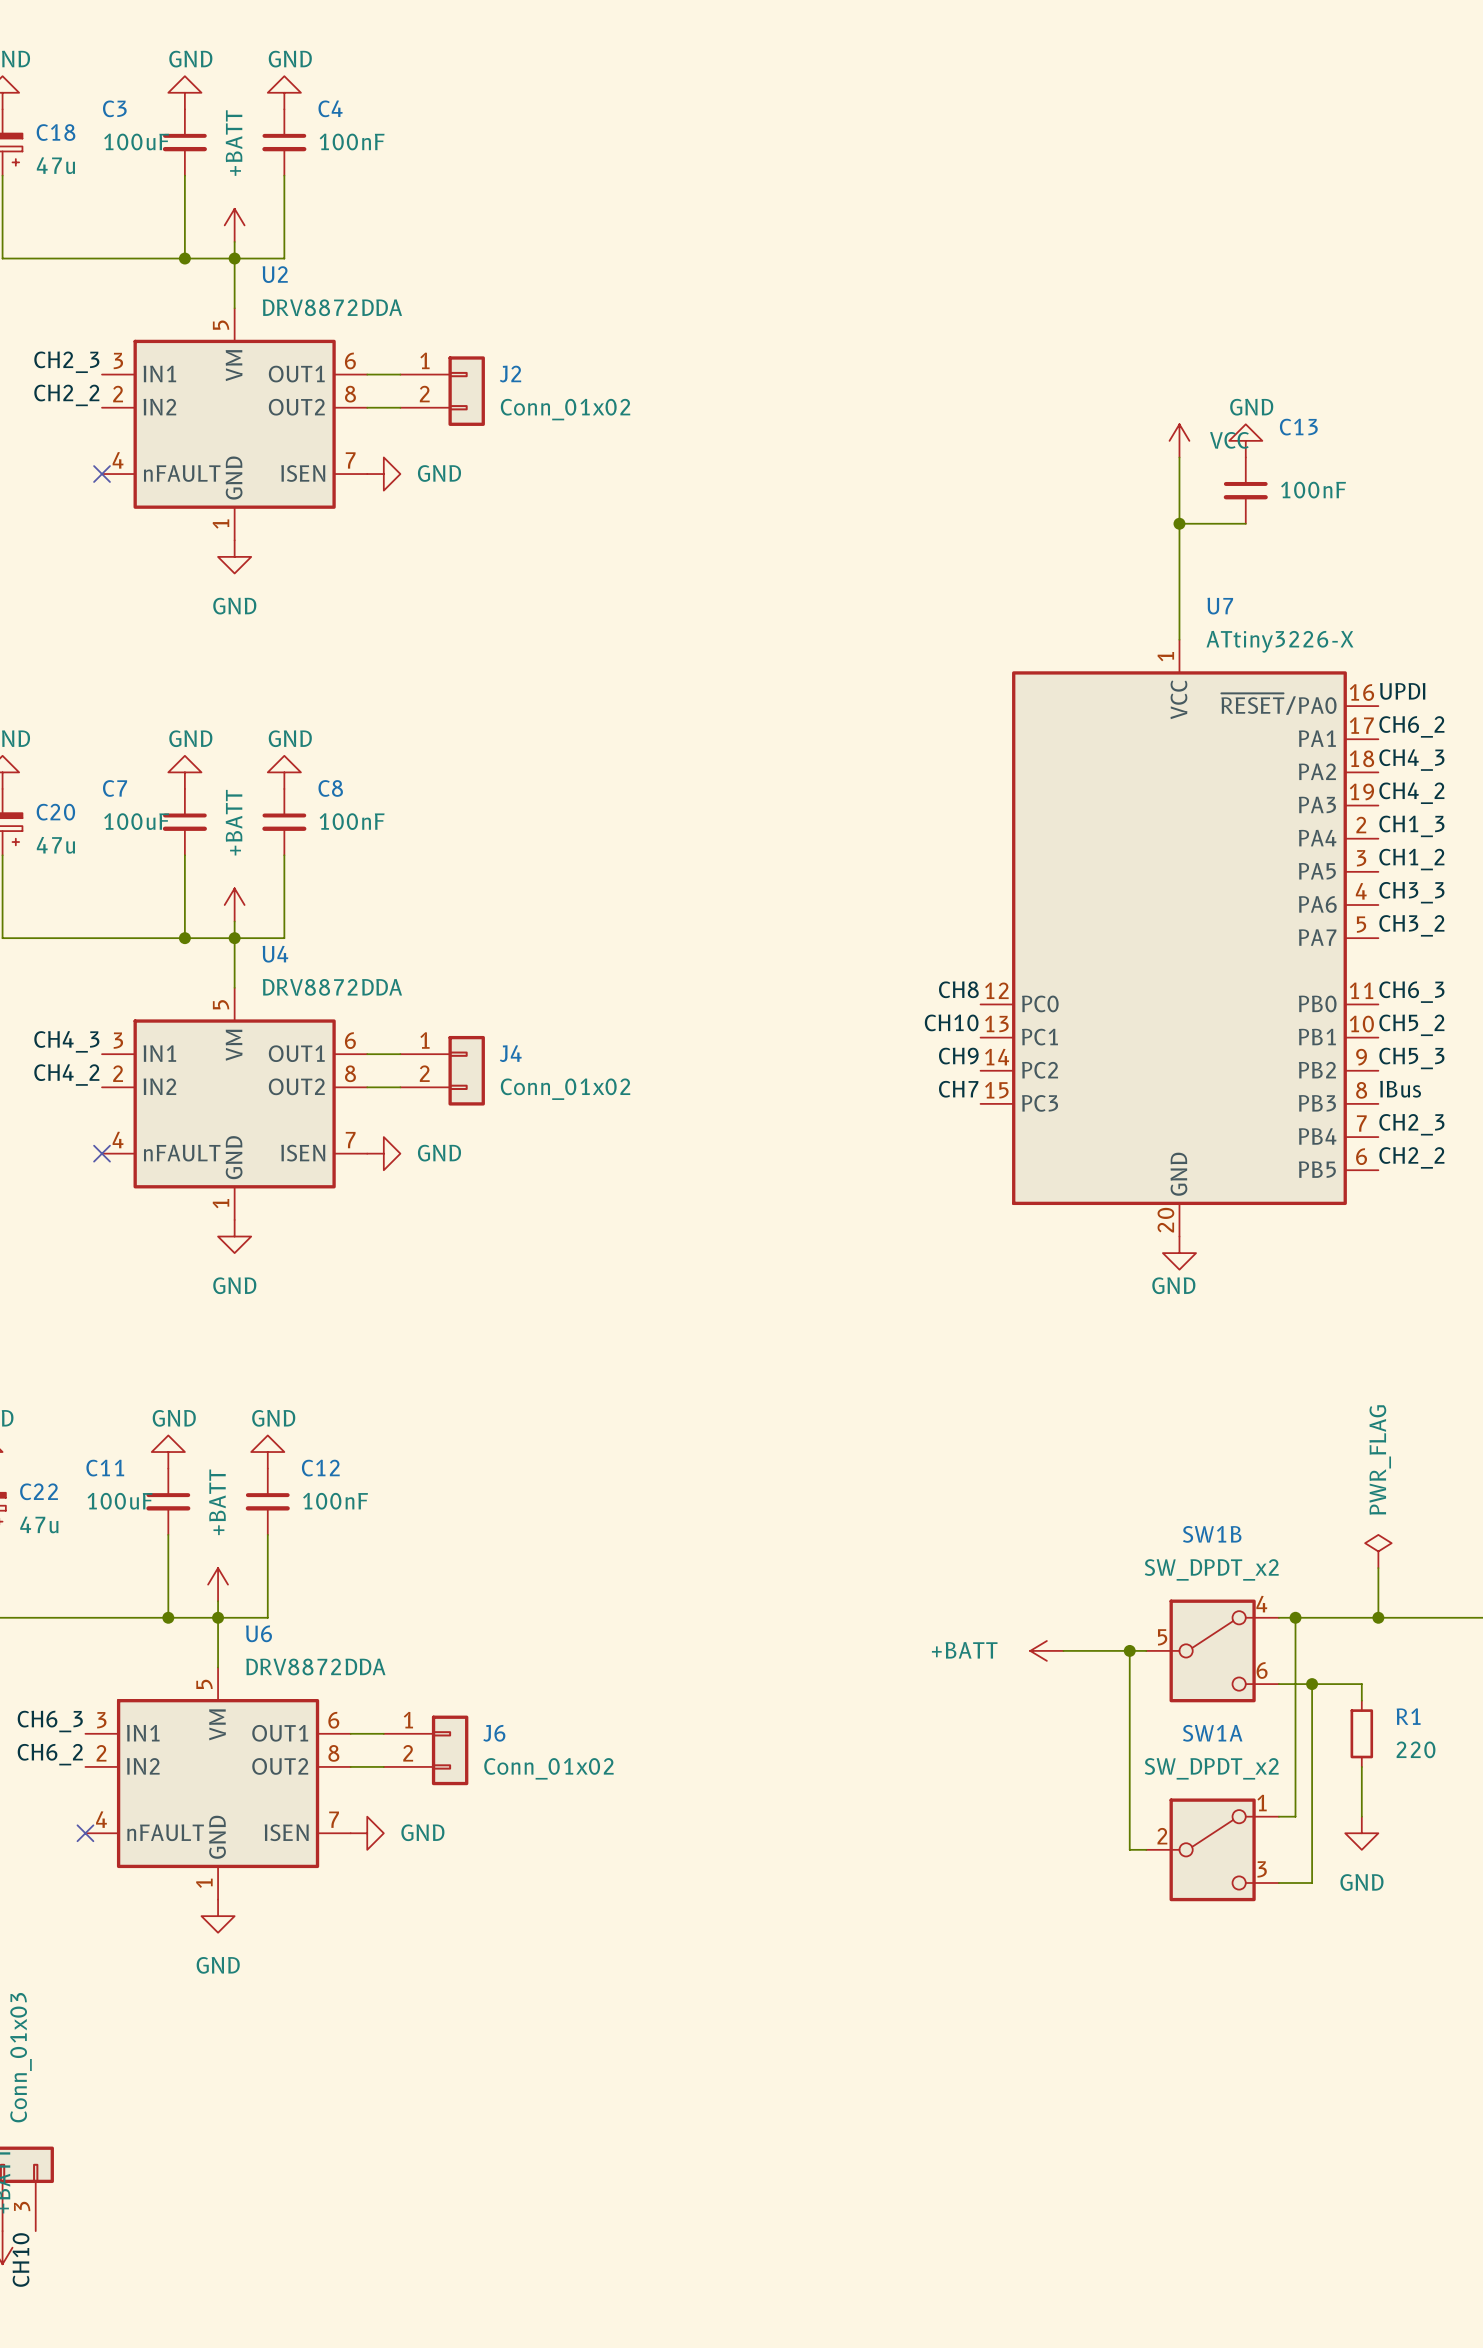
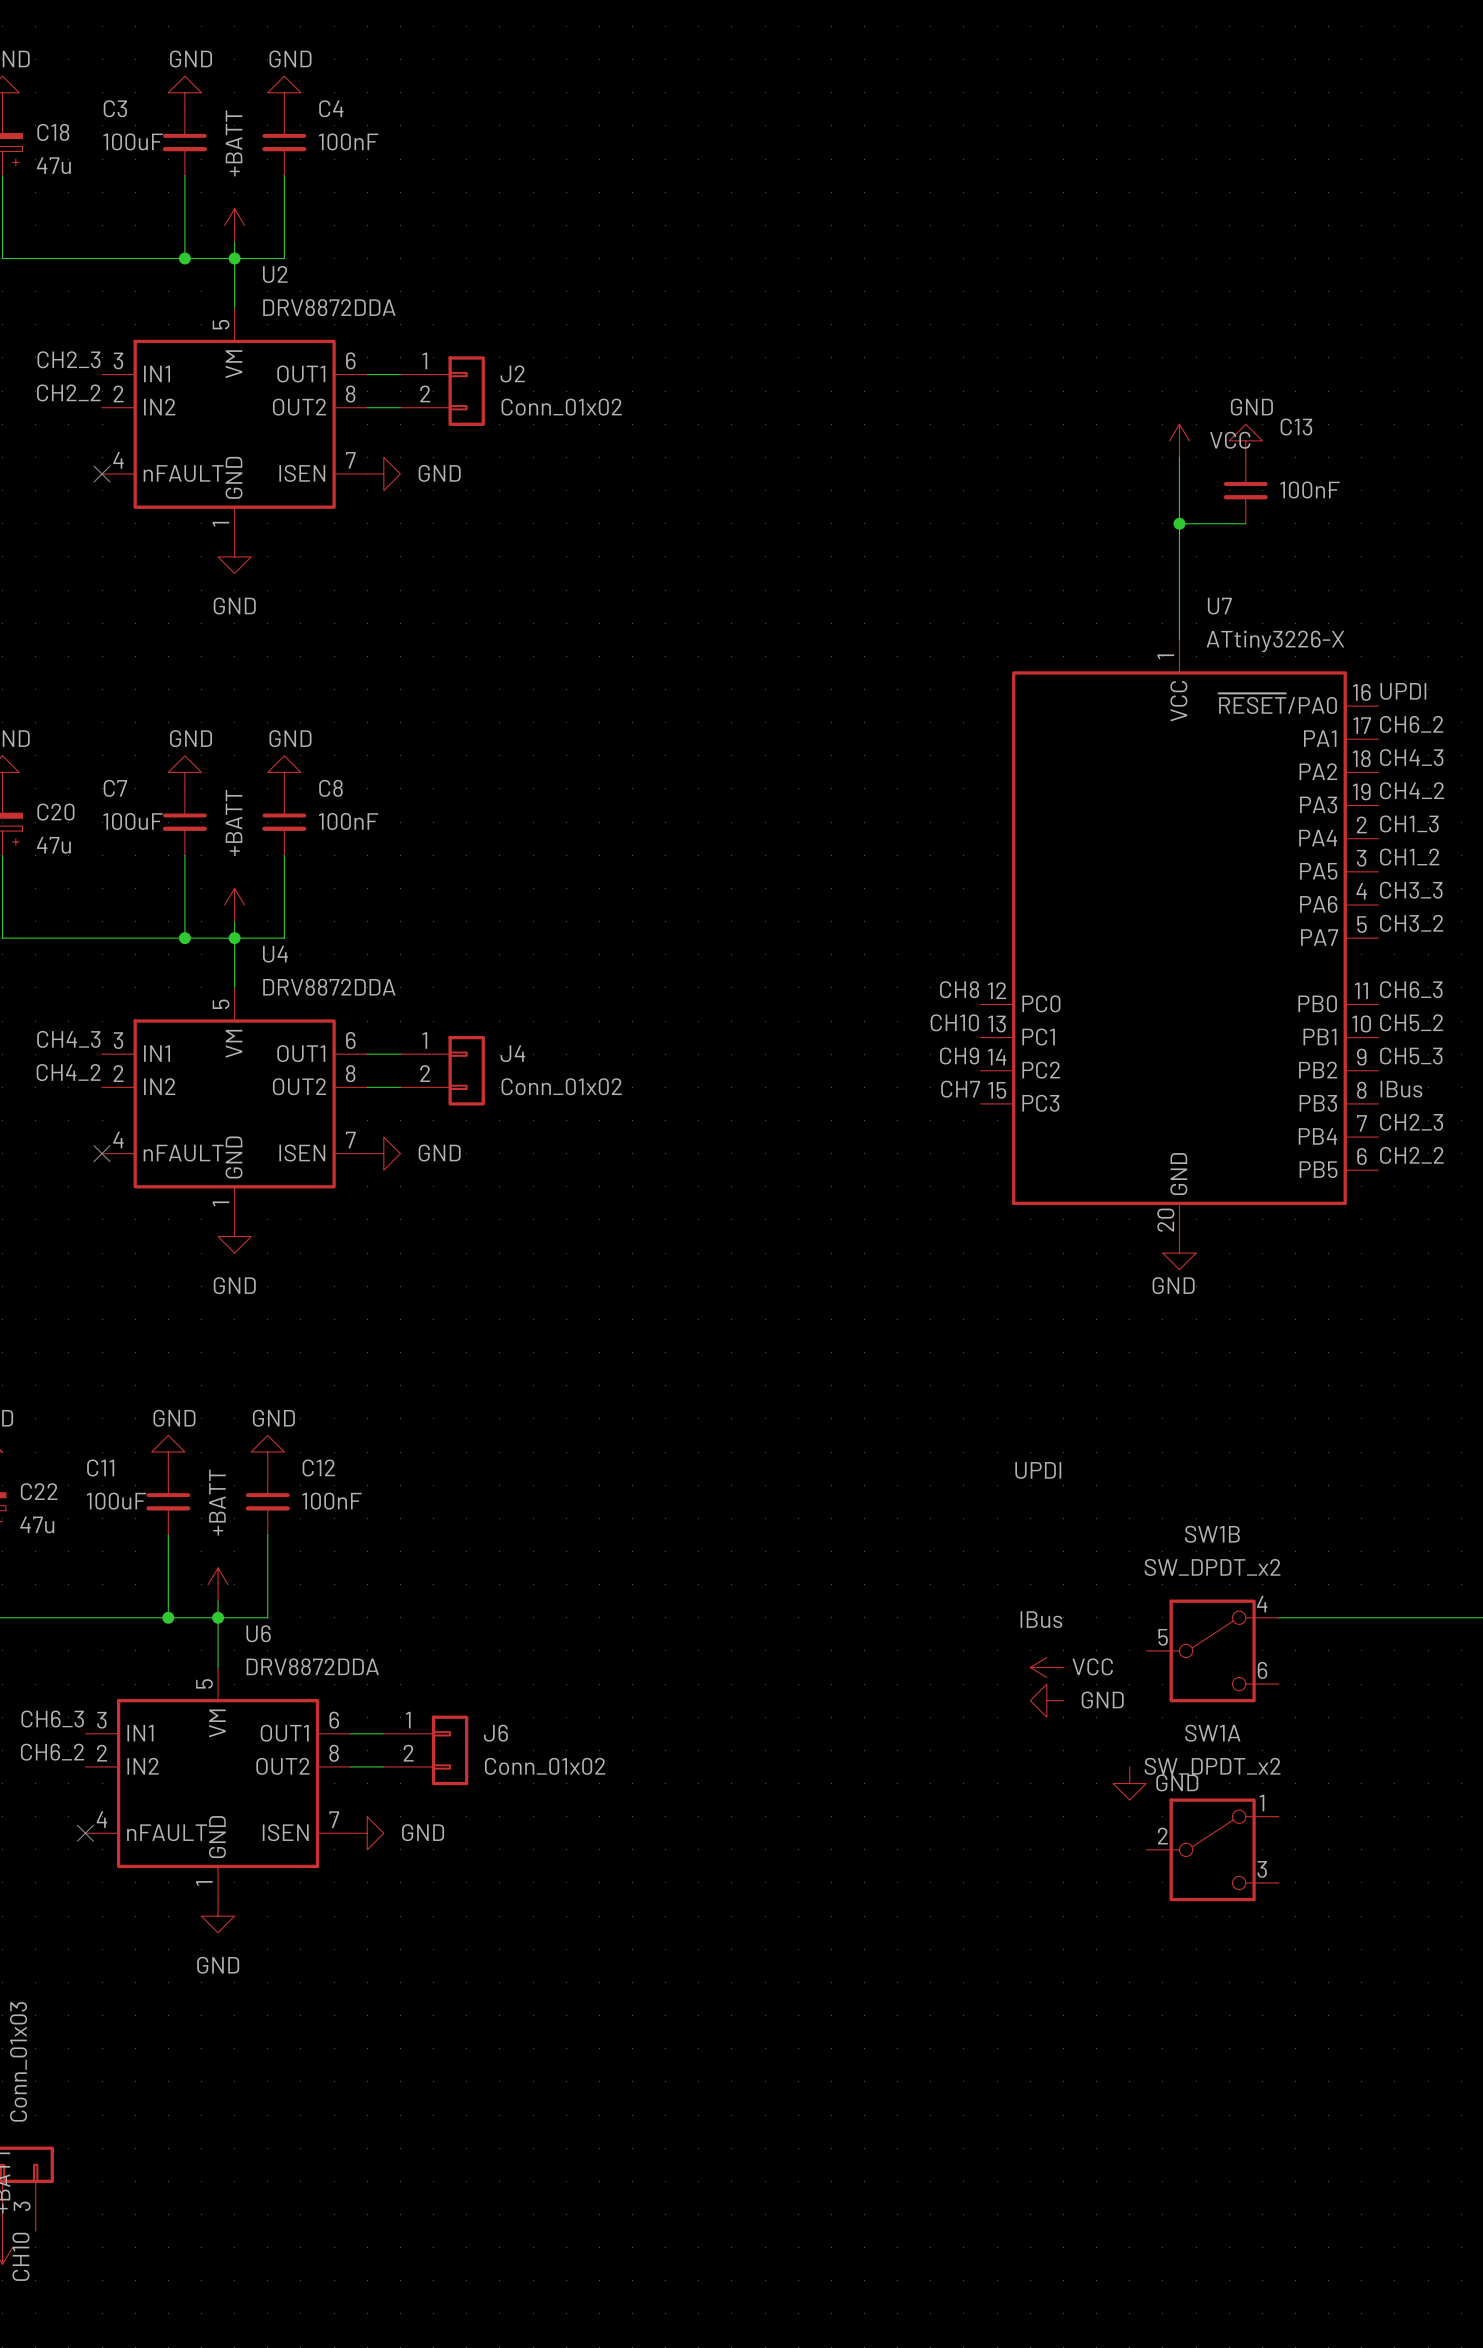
label: none -> UPDI (1038, 1470)
power symbol: PWR_FLAG (1378, 1551) -> none
wire: (1378, 1568) (1378, 1617) -> none
wire: (1295, 1617) (1295, 1816) (1278, 1816) -> none
junction: (1295, 1617) -> none
junction: (1378, 1617) -> none
label: none -> IBus (1041, 1619)
power symbol: +BATT (1046, 1650) -> none
wire: (1063, 1650) (1146, 1650) -> none
wire: (1129, 1650) (1129, 1849) (1146, 1849) -> none
junction: (1129, 1650) -> none
power symbol: none -> VCC (1046, 1667)
wire: (1278, 1684) (1361, 1684) (1361, 1700) -> none
wire: (1312, 1684) (1312, 1882) (1278, 1882) -> none
junction: (1312, 1684) -> none
power symbol: none -> GND (1046, 1700)
R1: 220 (1361, 1733) -> none
wire: (1361, 1766) (1361, 1816) -> none
power symbol: none -> GND (1129, 1783)
power symbol: GND (1361, 1833) -> none

